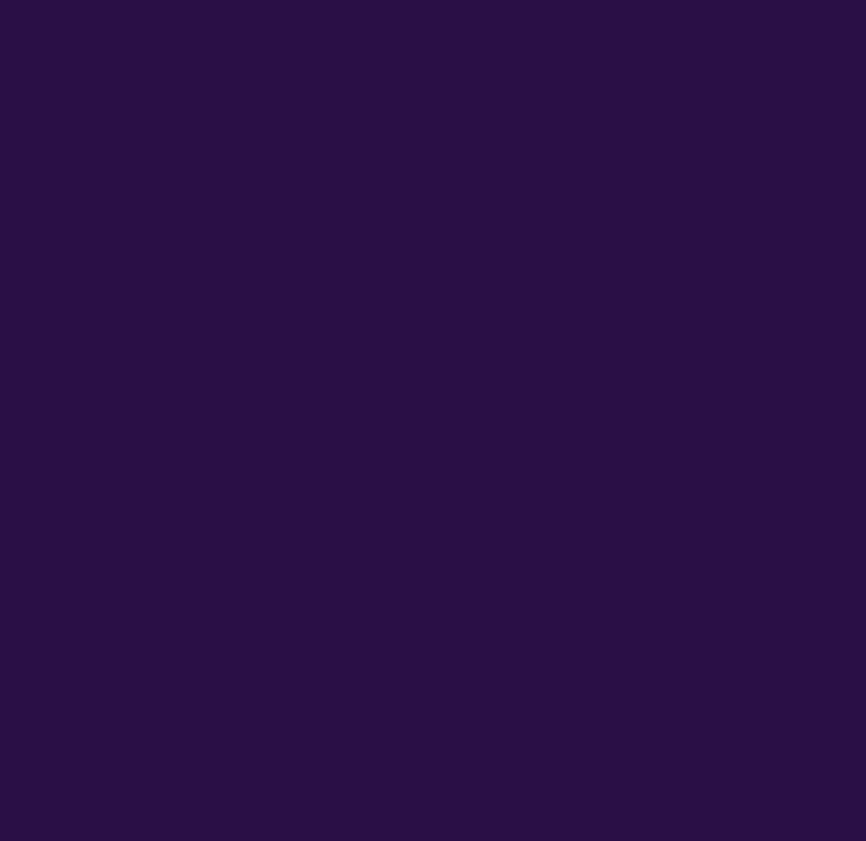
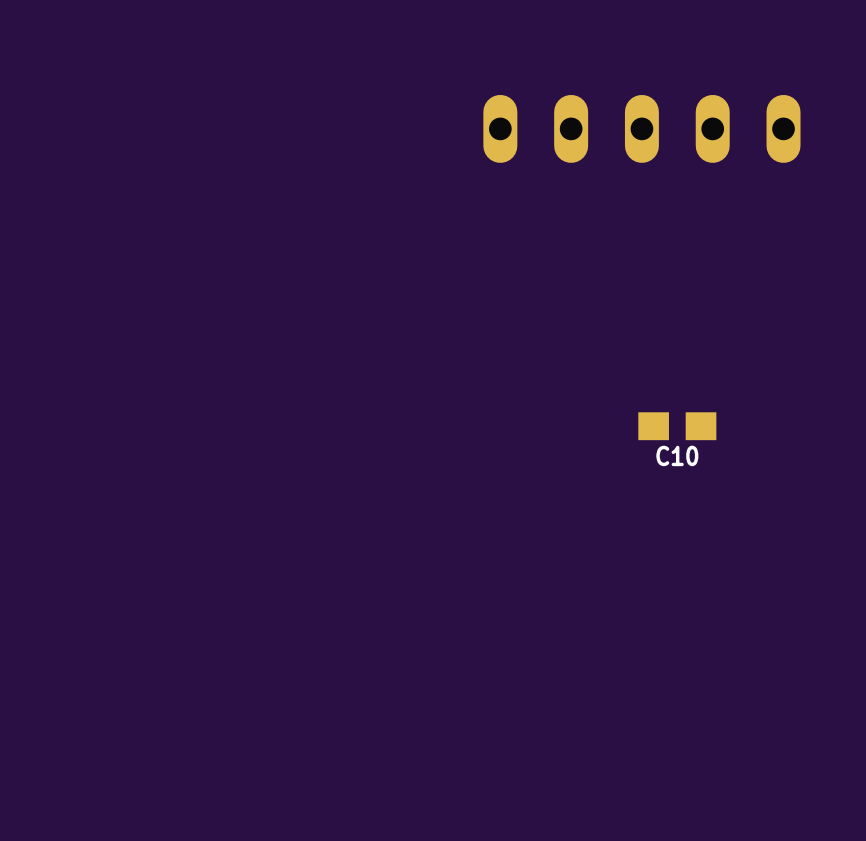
part: none -> (641, 128)
C10: none -> (677, 426)

